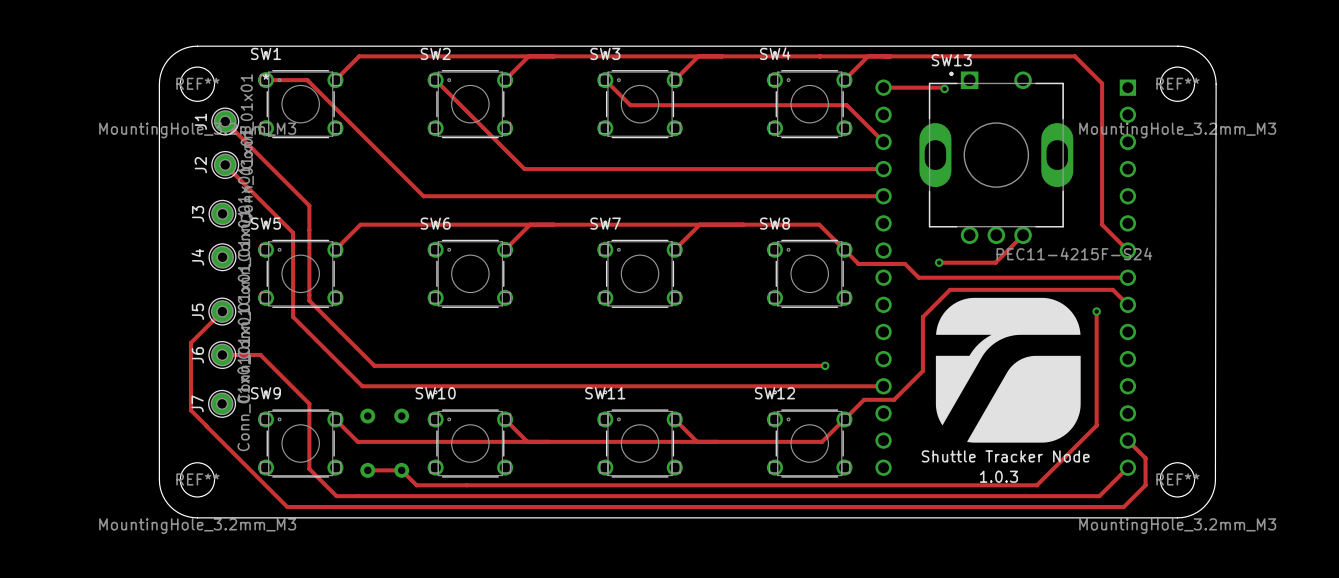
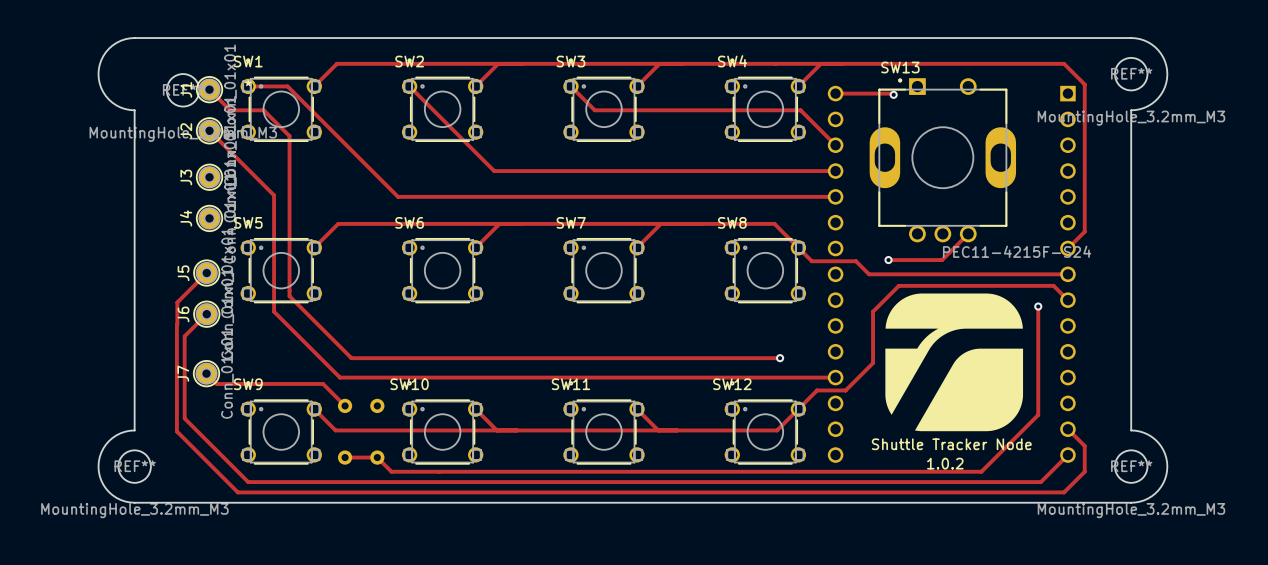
track: (1074, 56) (1102, 83) (1102, 224) (1127, 250) -> (1017, 63) (1064, 63) (1084, 84) (1084, 231) (1067, 248)
REF** position: (1177, 84) -> (1131, 74)
track: (225, 121) (309, 205) -> (209, 89) (230, 110) (263, 110) (289, 136) (289, 205)
J1 position: (225, 121) -> (209, 89)
track: (225, 164) (293, 232) -> (209, 130) (274, 195) (274, 231)
J2 position: (225, 164) -> (209, 130)
J3 position: (222, 213) -> (209, 177)
J4 position: (222, 257) -> (209, 218)
track: (222, 311) (190, 342) -> (206, 273) (177, 302) (176, 336)
J5 position: (222, 311) -> (206, 273)
track: (222, 354) (260, 354) (309, 403) (309, 469) (336, 496) -> (206, 314) (184, 336) (184, 418) (248, 482) (315, 482)
J6 position: (222, 354) -> (206, 314)
track: none -> (206, 373) (216, 383) (323, 383) (345, 405)
J7 position: (222, 403) -> (206, 373)
track: (190, 410) (287, 507) -> (176, 400) (176, 431) (237, 492) (268, 492)
text: 1.0.3 (998, 476) -> 1.0.2 (945, 463)
REF** position: (197, 479) -> (134, 466)
REF** position: (1177, 479) -> (1131, 466)
board edge: (197, 517) (184, 515) (170, 506) (161, 492) (159, 479) (159, 84) (165, 63) (180, 49) (197, 46) (1178, 46) (1194, 49) (1204, 57) (1213, 71) (1216, 84) (1215, 484) (1211, 496) (1204, 506) (1193, 514) (1177, 517) -> (183, 502) (134, 502) (120, 499) (105, 488) (98, 471) (101, 452) (109, 441) (120, 433) (134, 430) (134, 110) (120, 107) (109, 99) (101, 88) (98, 74) (101, 60) (109, 48) (116, 42) (129, 38) (1131, 38) (1148, 42) (1158, 50) (1163, 57) (1167, 74) (1165, 86) (1158, 98) (1144, 107) (1131, 110) (1131, 430) (1148, 434) (1158, 442) (1165, 453) (1167, 470) (1163, 483) (1151, 496) (1135, 502) (1115, 502)

